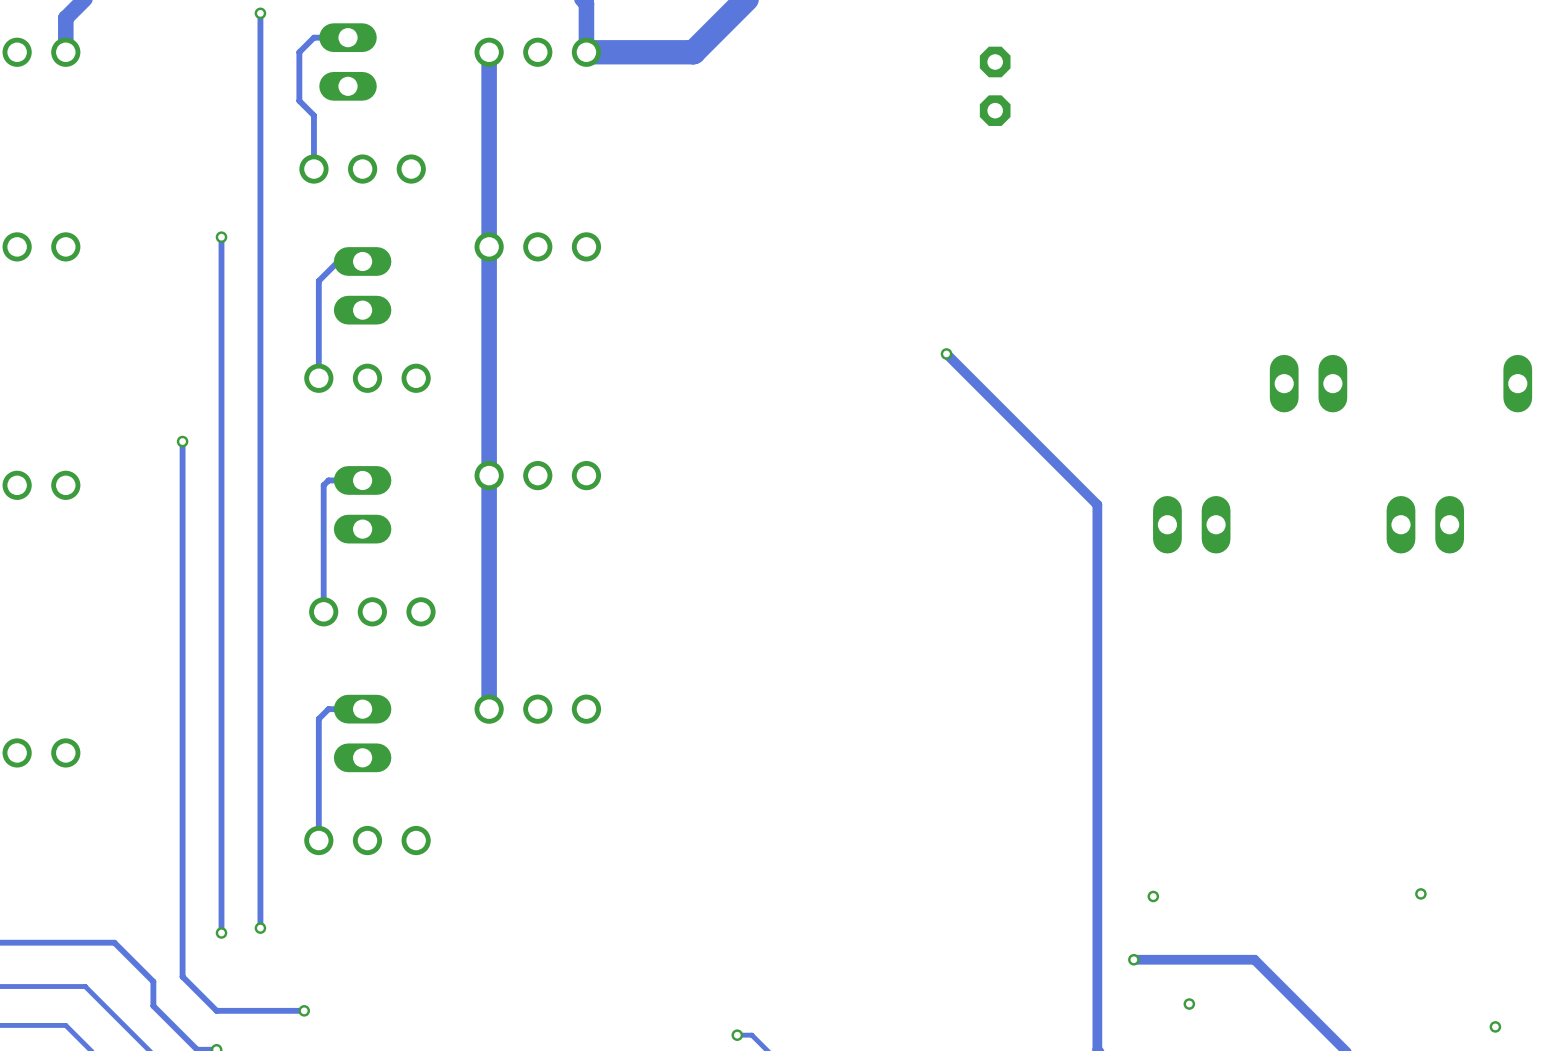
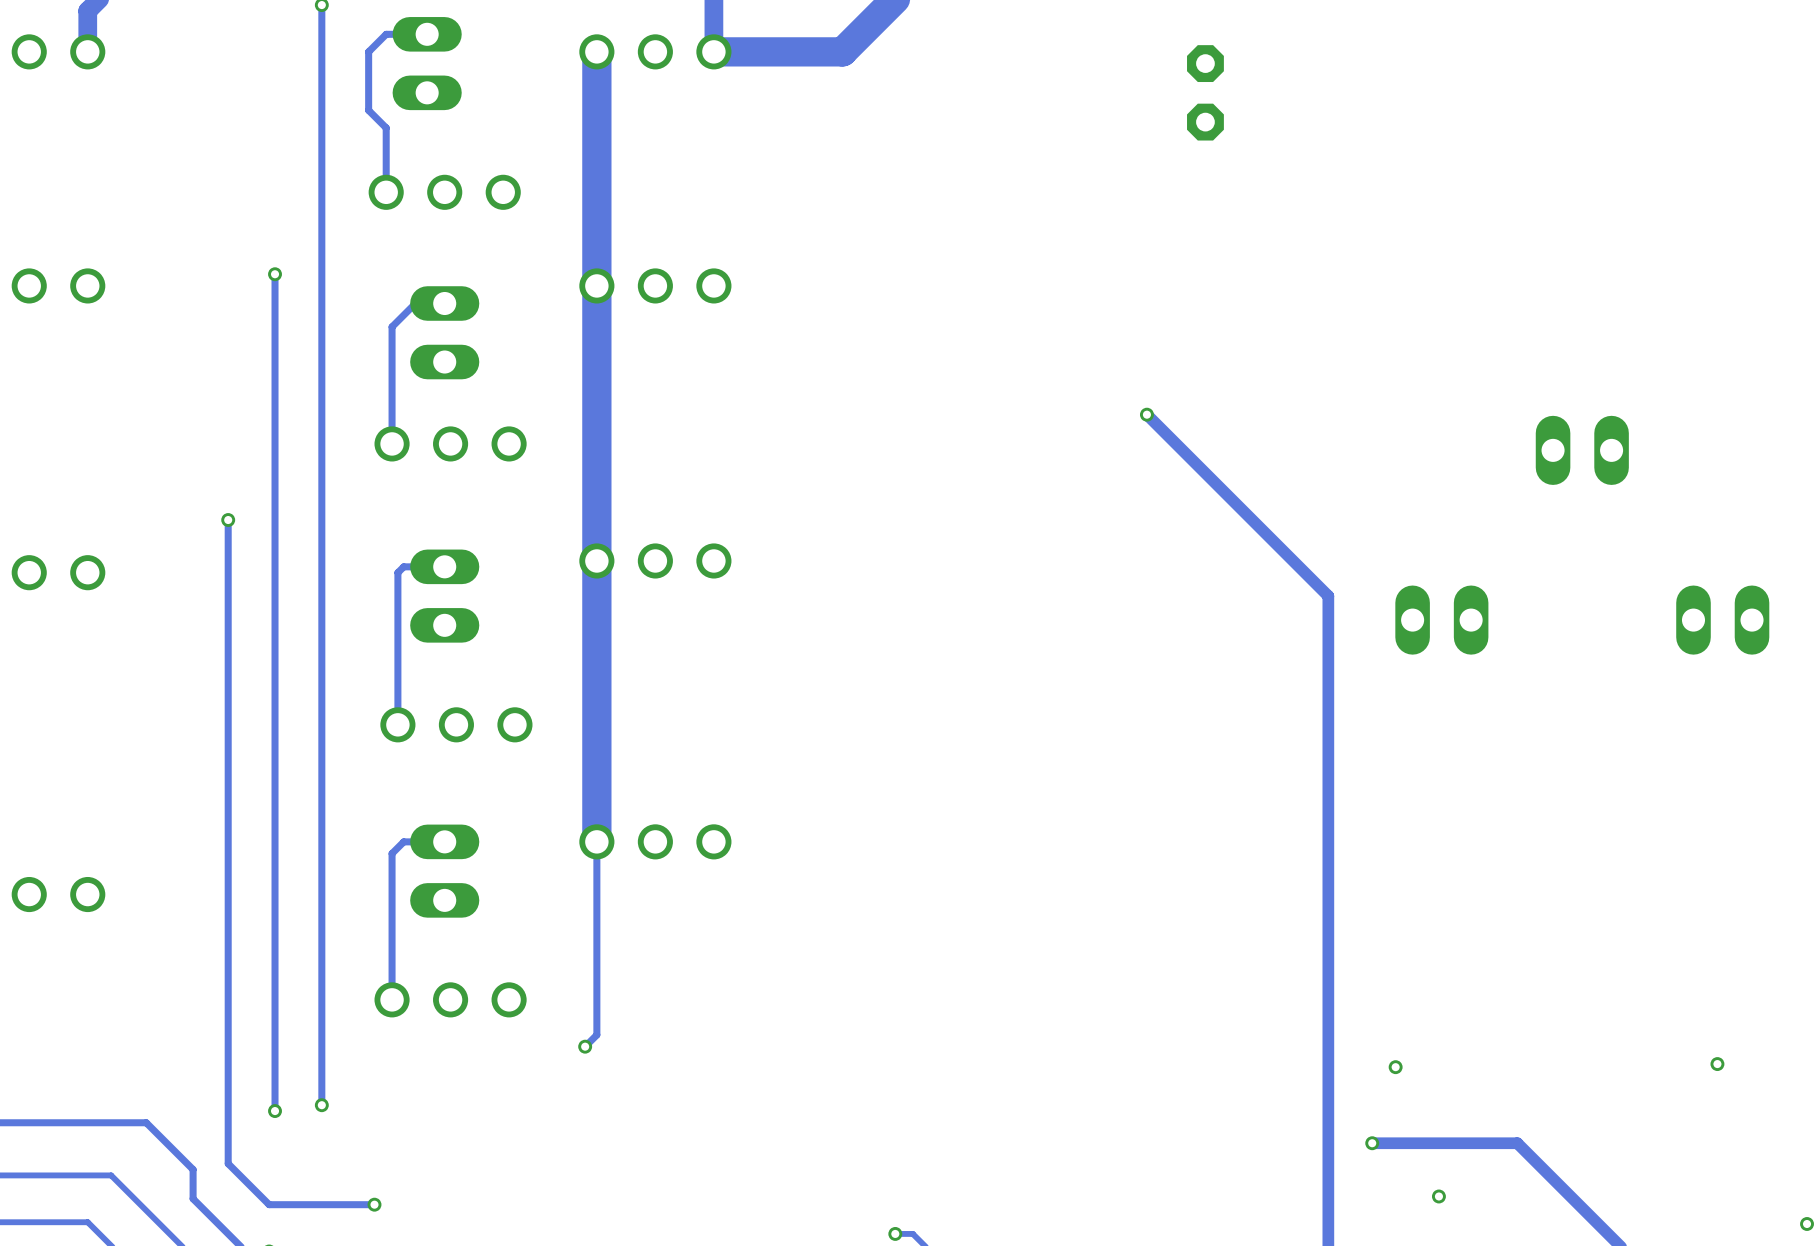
track width: thin (489, 52) (489, 709) -> thick (596, 51) (596, 841)
track: none -> (596, 841) (596, 1034) (585, 1046)
via: none -> (585, 1046)

